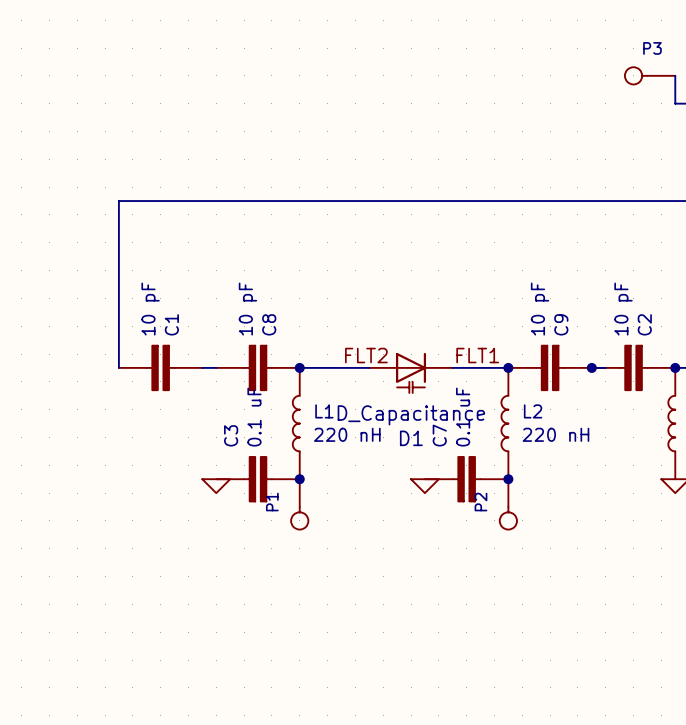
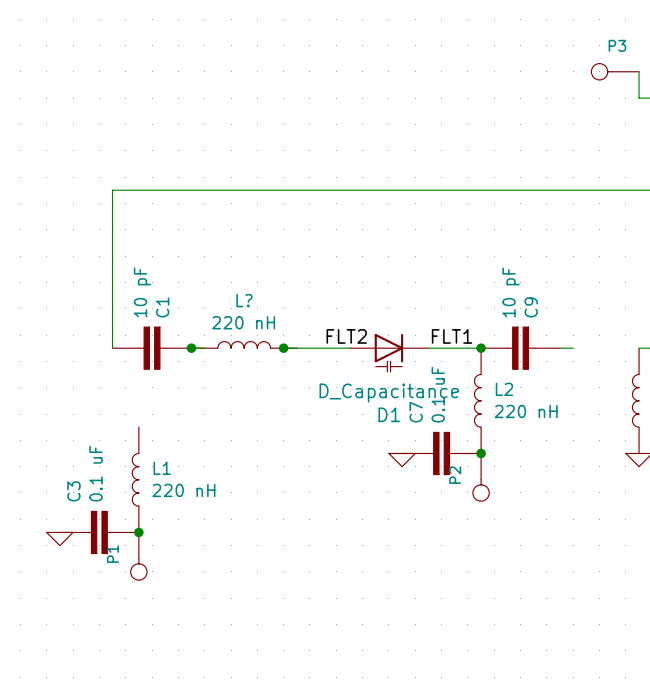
L?: none -> 220 nH (244, 344)
junction: none -> (191, 348)
C8: 10 pF (258, 367) -> none
junction: (591, 367) -> none
C2: 10 pF (633, 367) -> none
junction: (675, 367) -> none
L1 position: (296, 423) -> (135, 479)
C3 position: (258, 479) -> (99, 532)
junction: (299, 479) -> none
power symbol position: (216, 486) -> (59, 539)
P1 position: (299, 504) -> (138, 556)
junction: none -> (138, 532)

